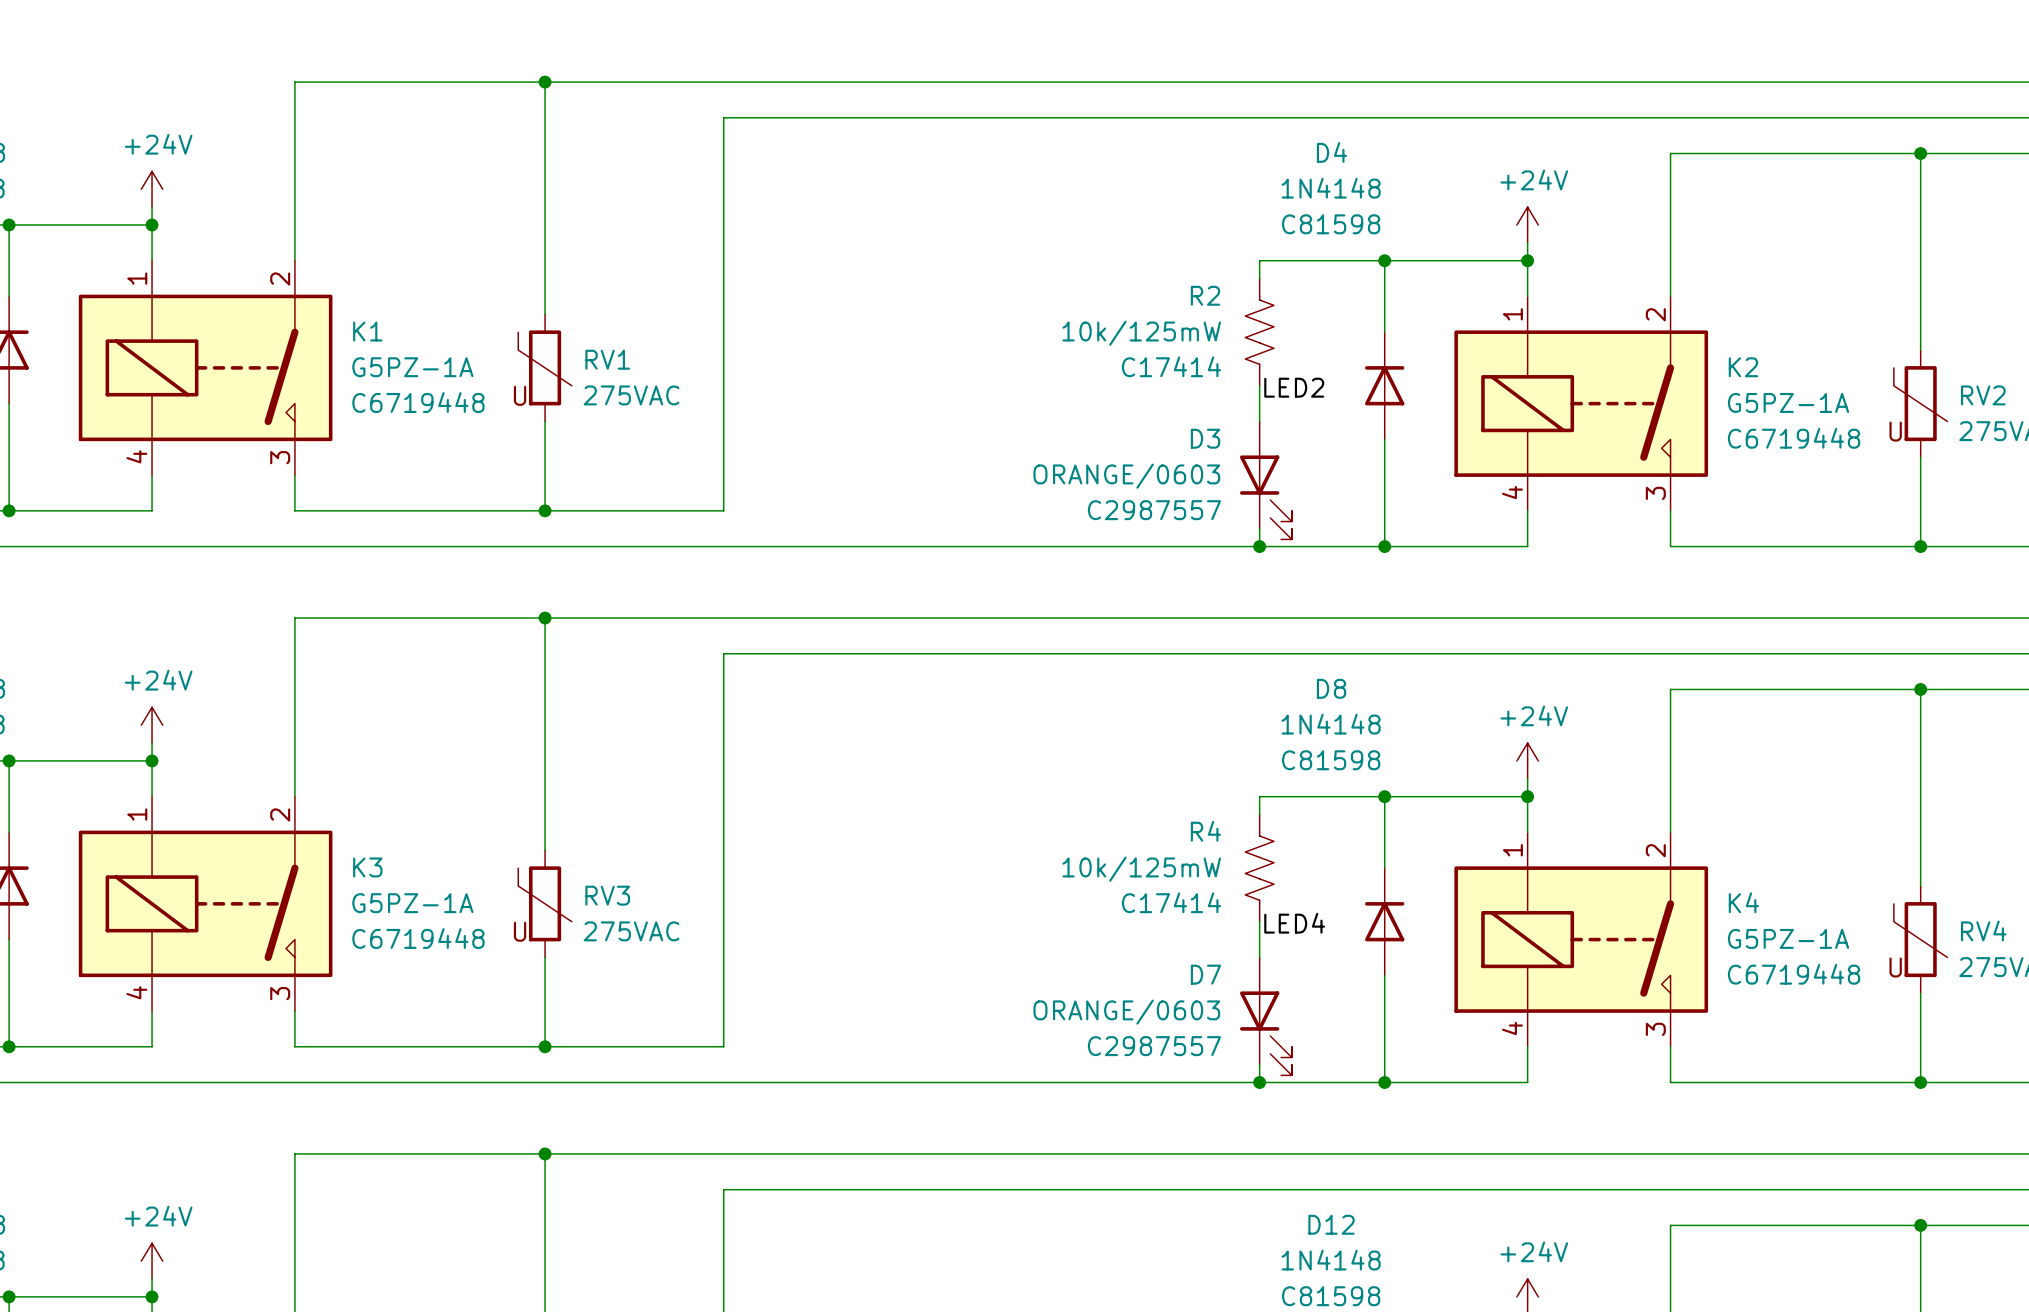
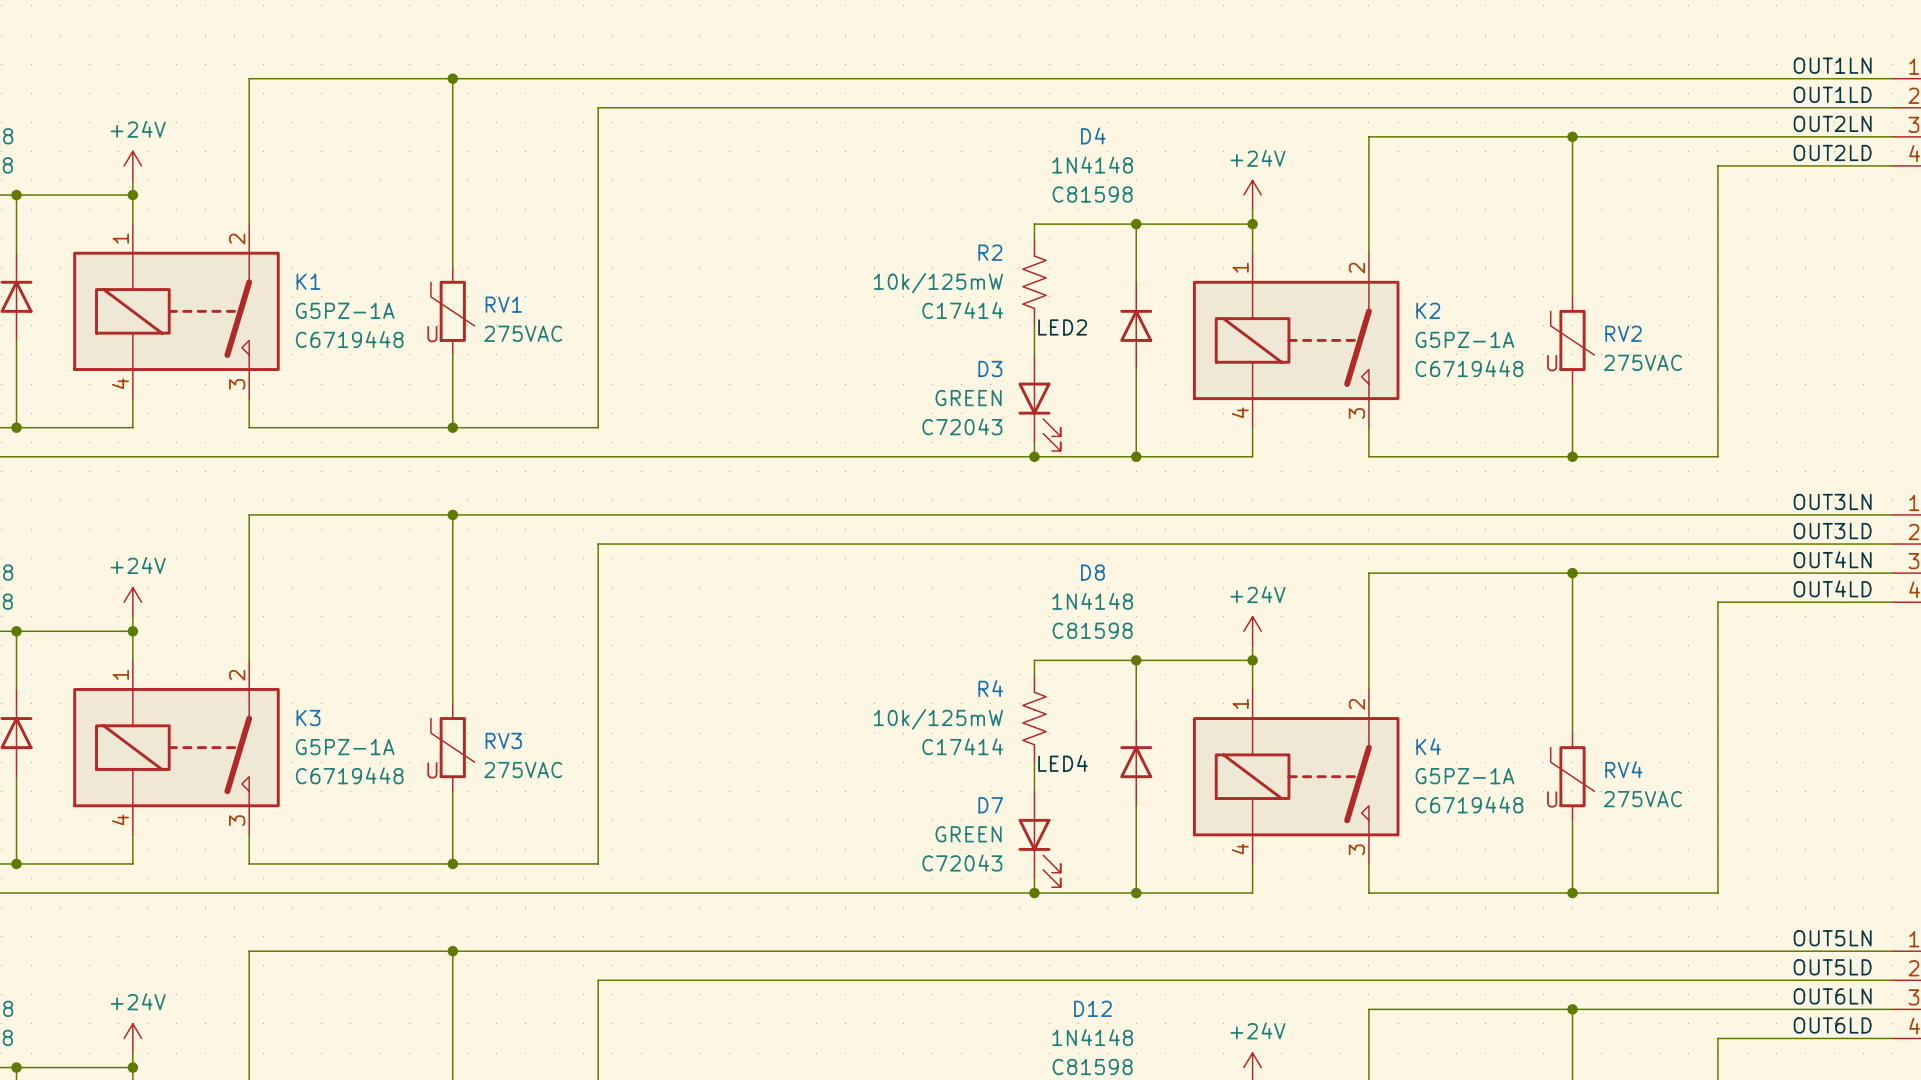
D3 value: ORANGE/0603 (1126, 476) -> GREEN (968, 398)
D3 text: C2987557 (1154, 510) -> C72043 (962, 426)
D7 value: ORANGE/0603 (1126, 1012) -> GREEN (968, 834)
D7 text: C2987557 (1154, 1046) -> C72043 (962, 863)

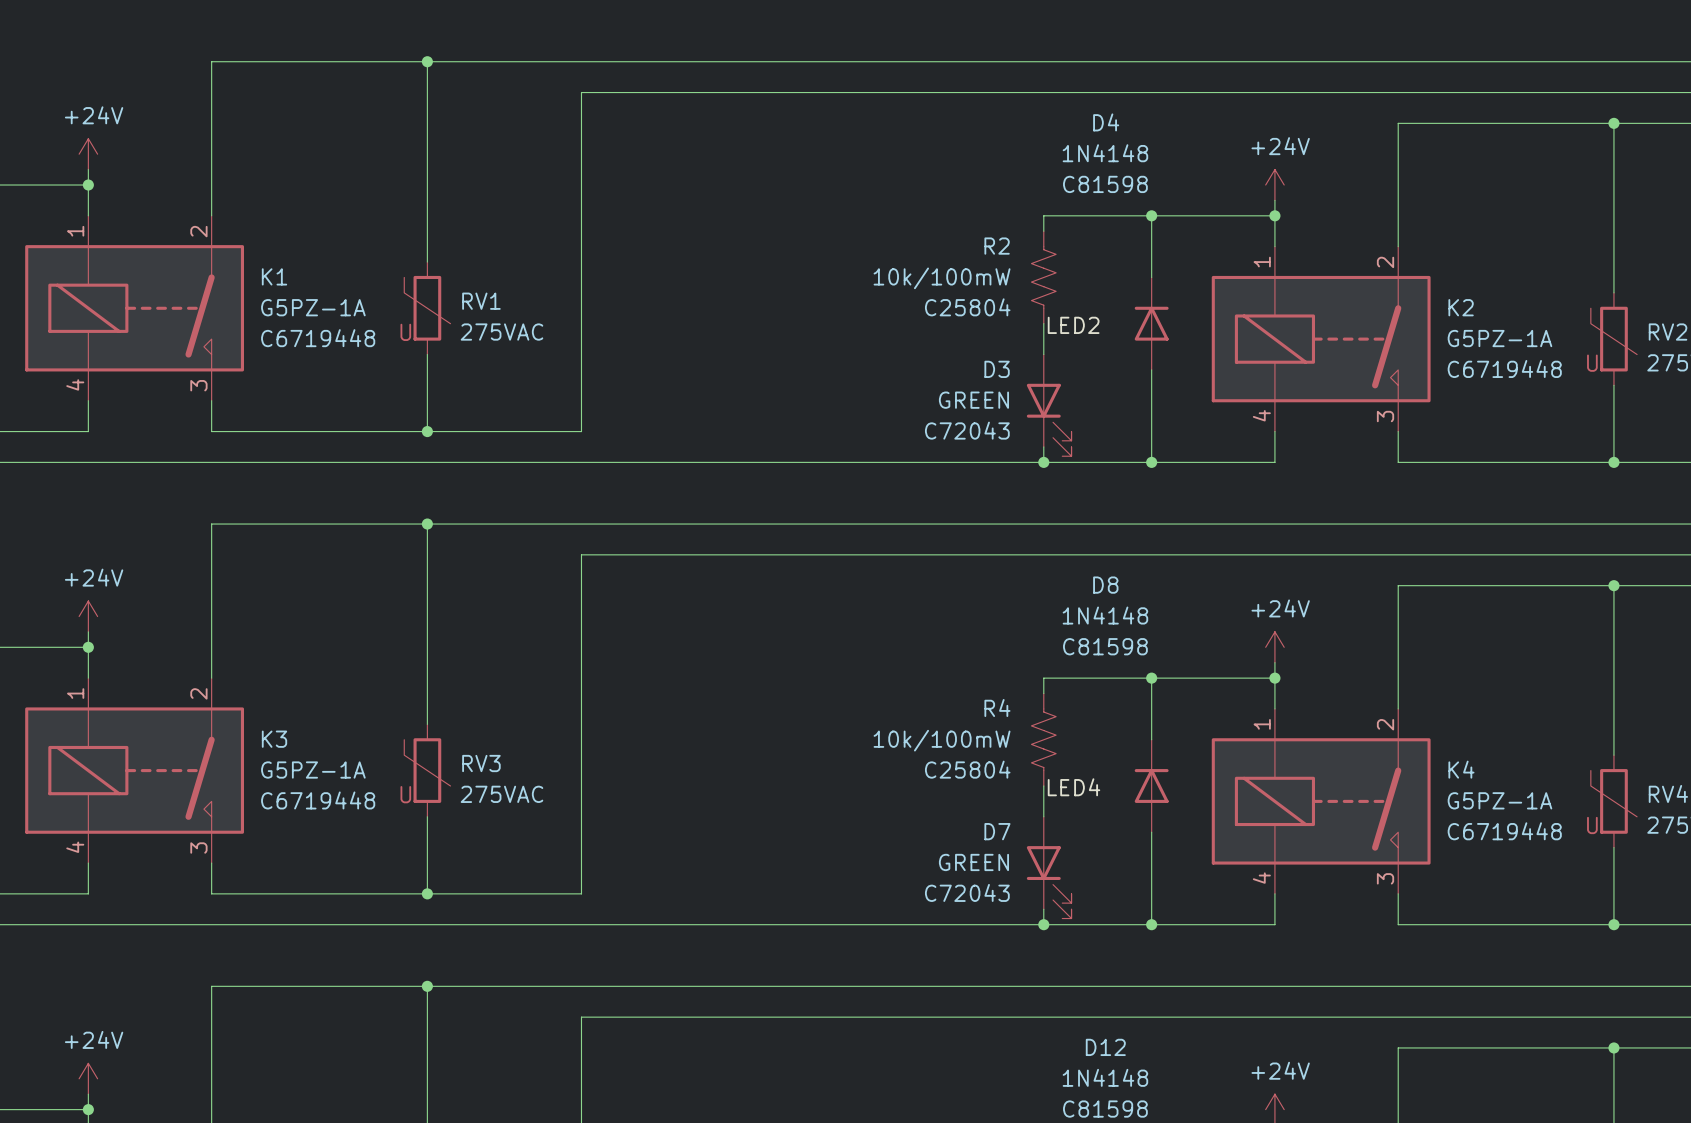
R2 value: 10k/125mW (938, 283) -> 10k/100mW (942, 278)
R2 text: C17414 (962, 310) -> C25804 (967, 307)
R4 value: 10k/125mW (938, 719) -> 10k/100mW (942, 740)
R4 text: C17414 (962, 746) -> C25804 (967, 769)

